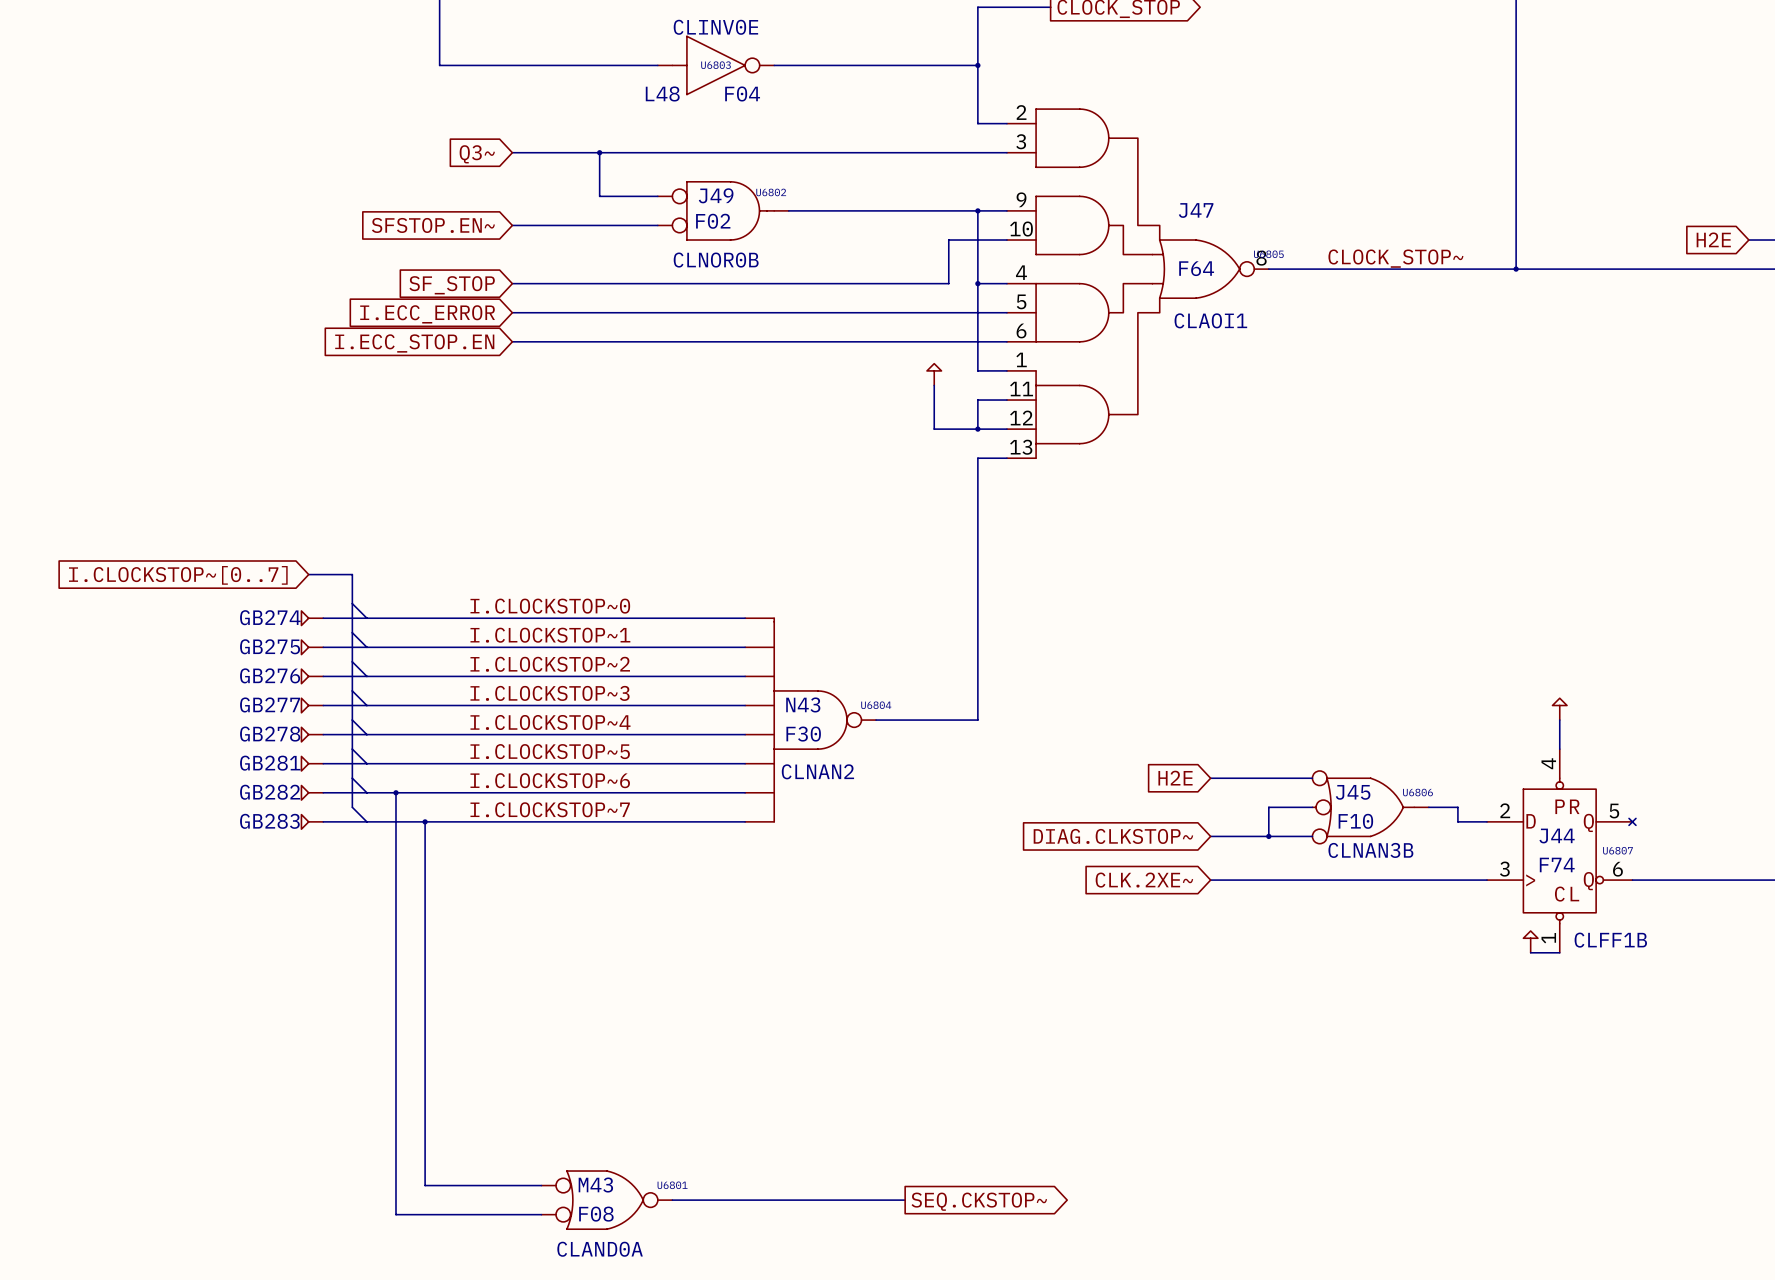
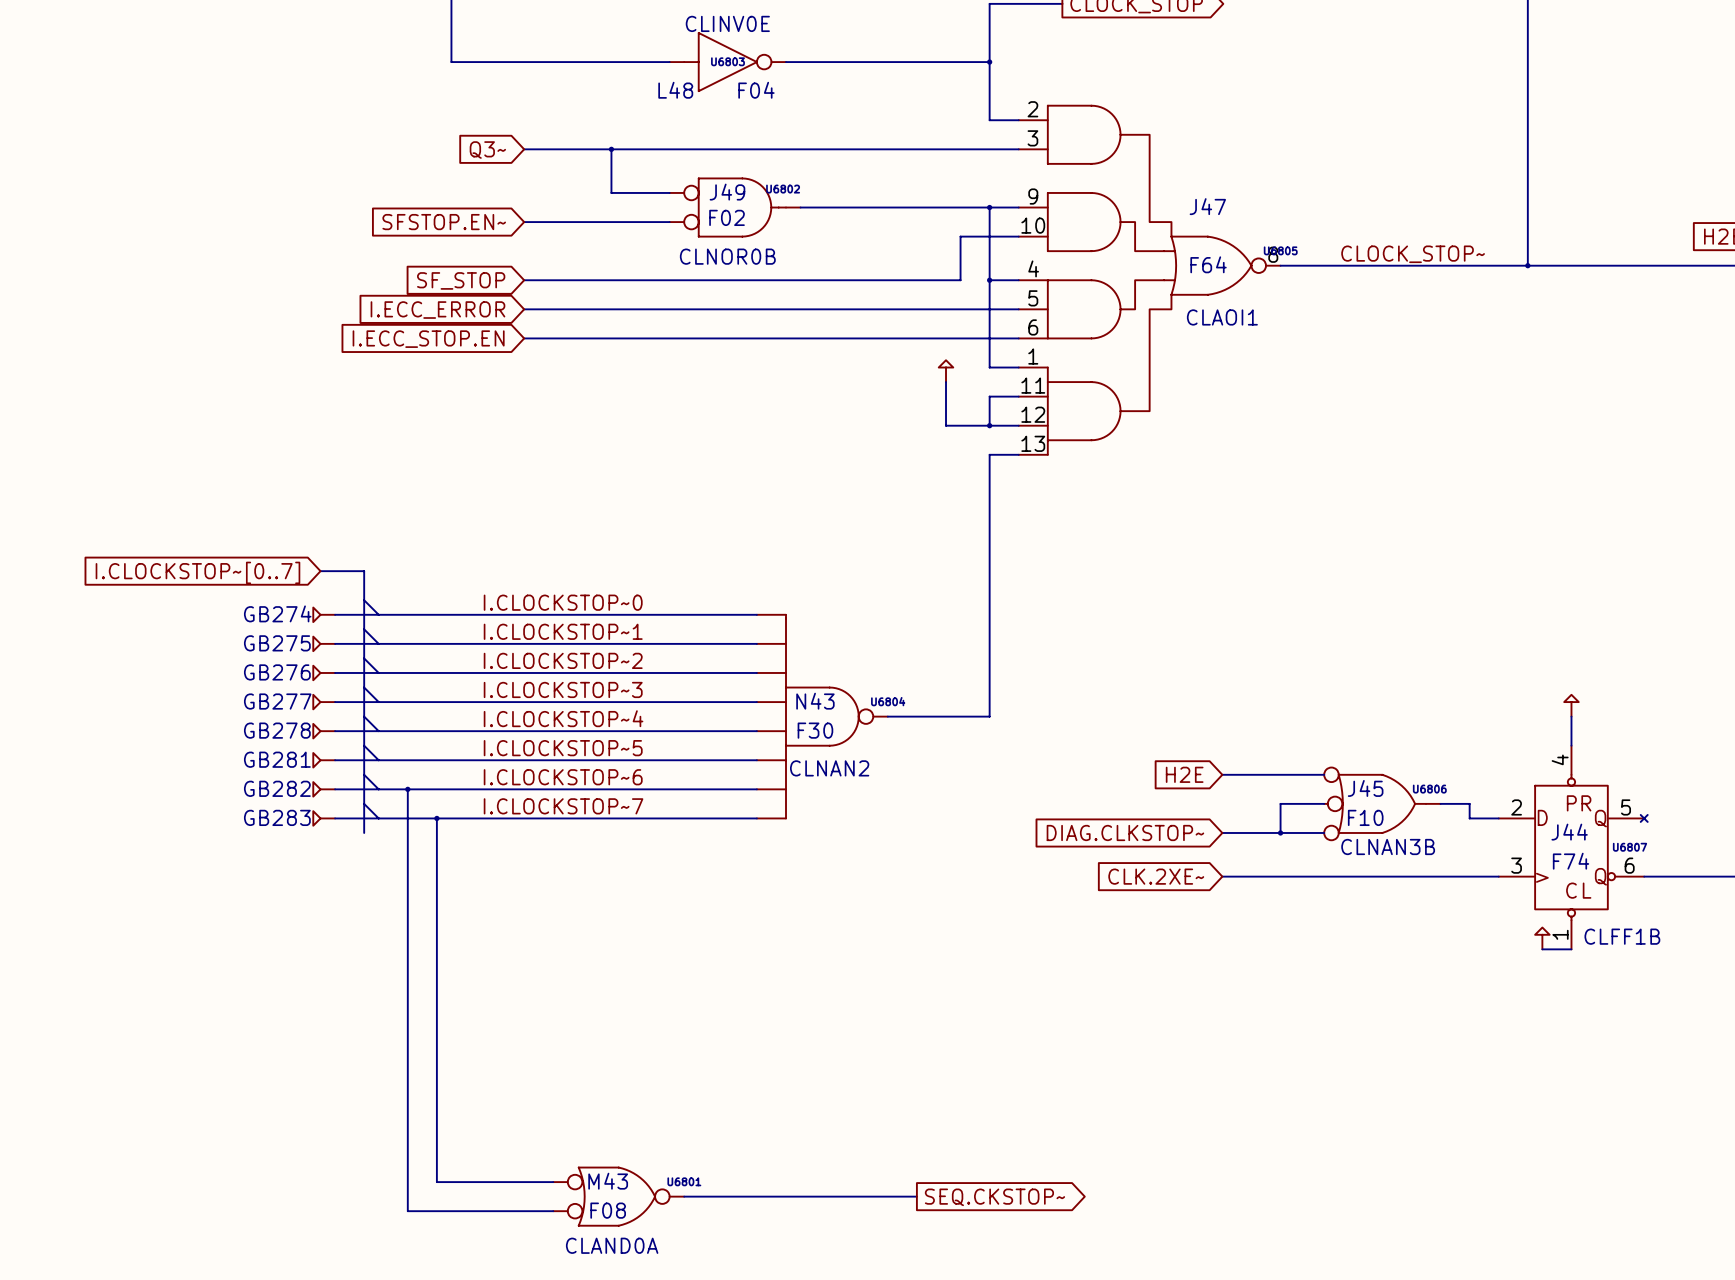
bus: none -> (364, 803) (364, 832)

